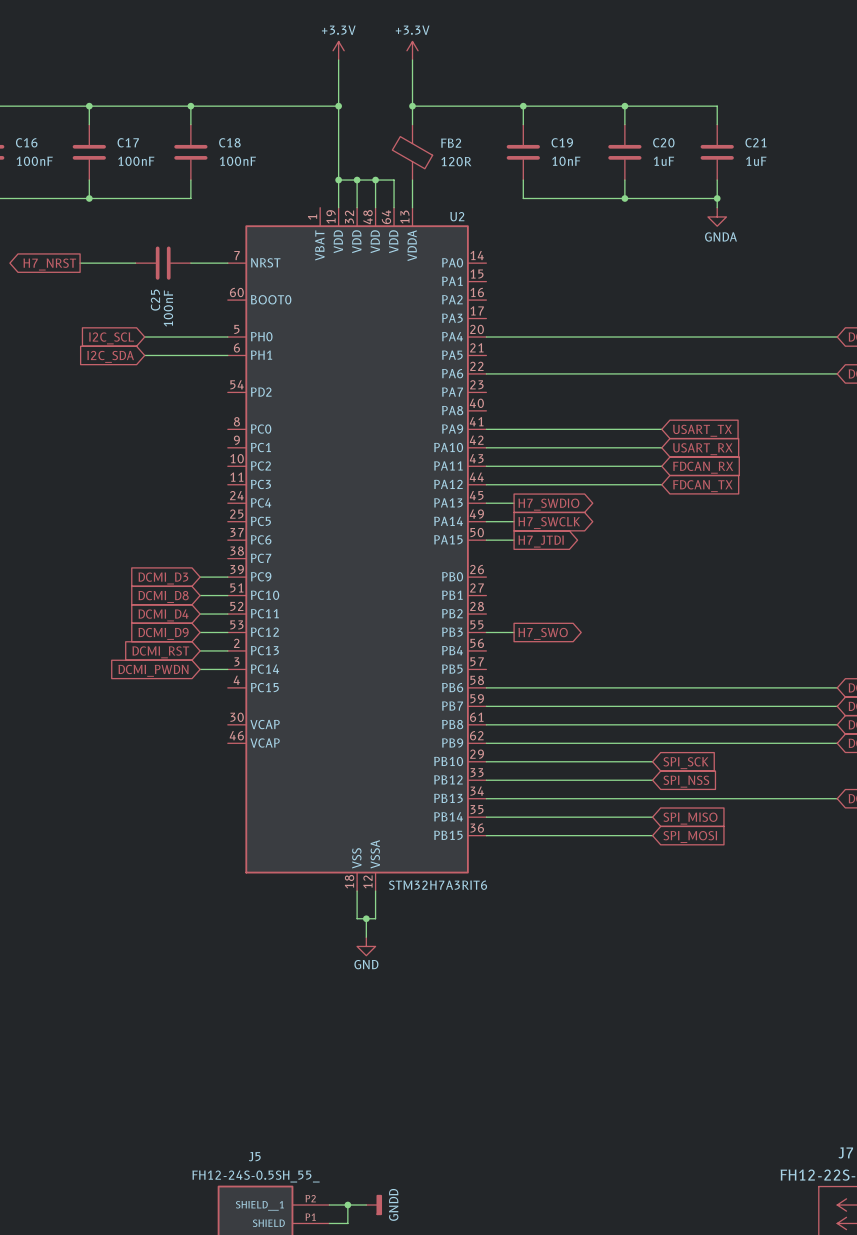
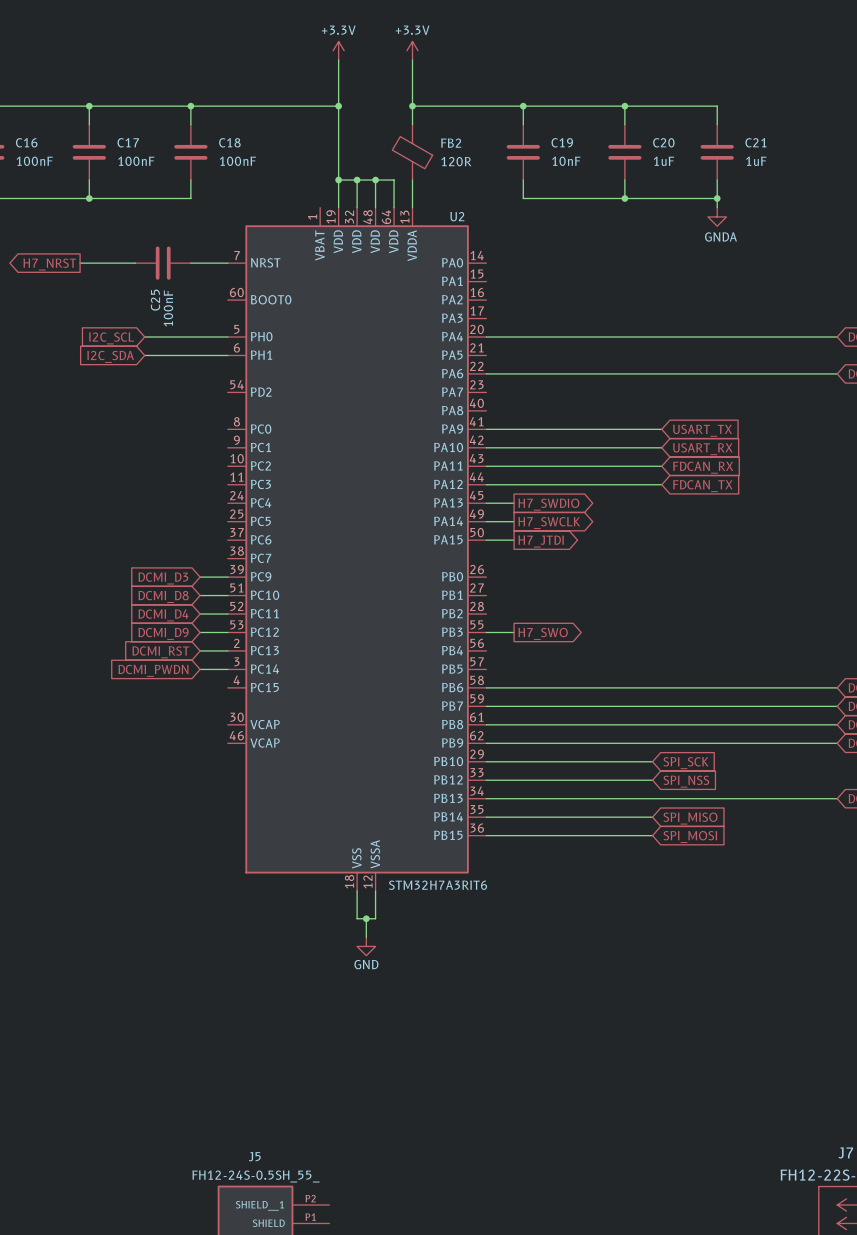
wire: (329, 1205) (366, 1205) -> none
wire: (347, 1205) (347, 1223) (329, 1223) -> none
junction: (347, 1205) -> none
power symbol: GNDD (374, 1205) -> none

